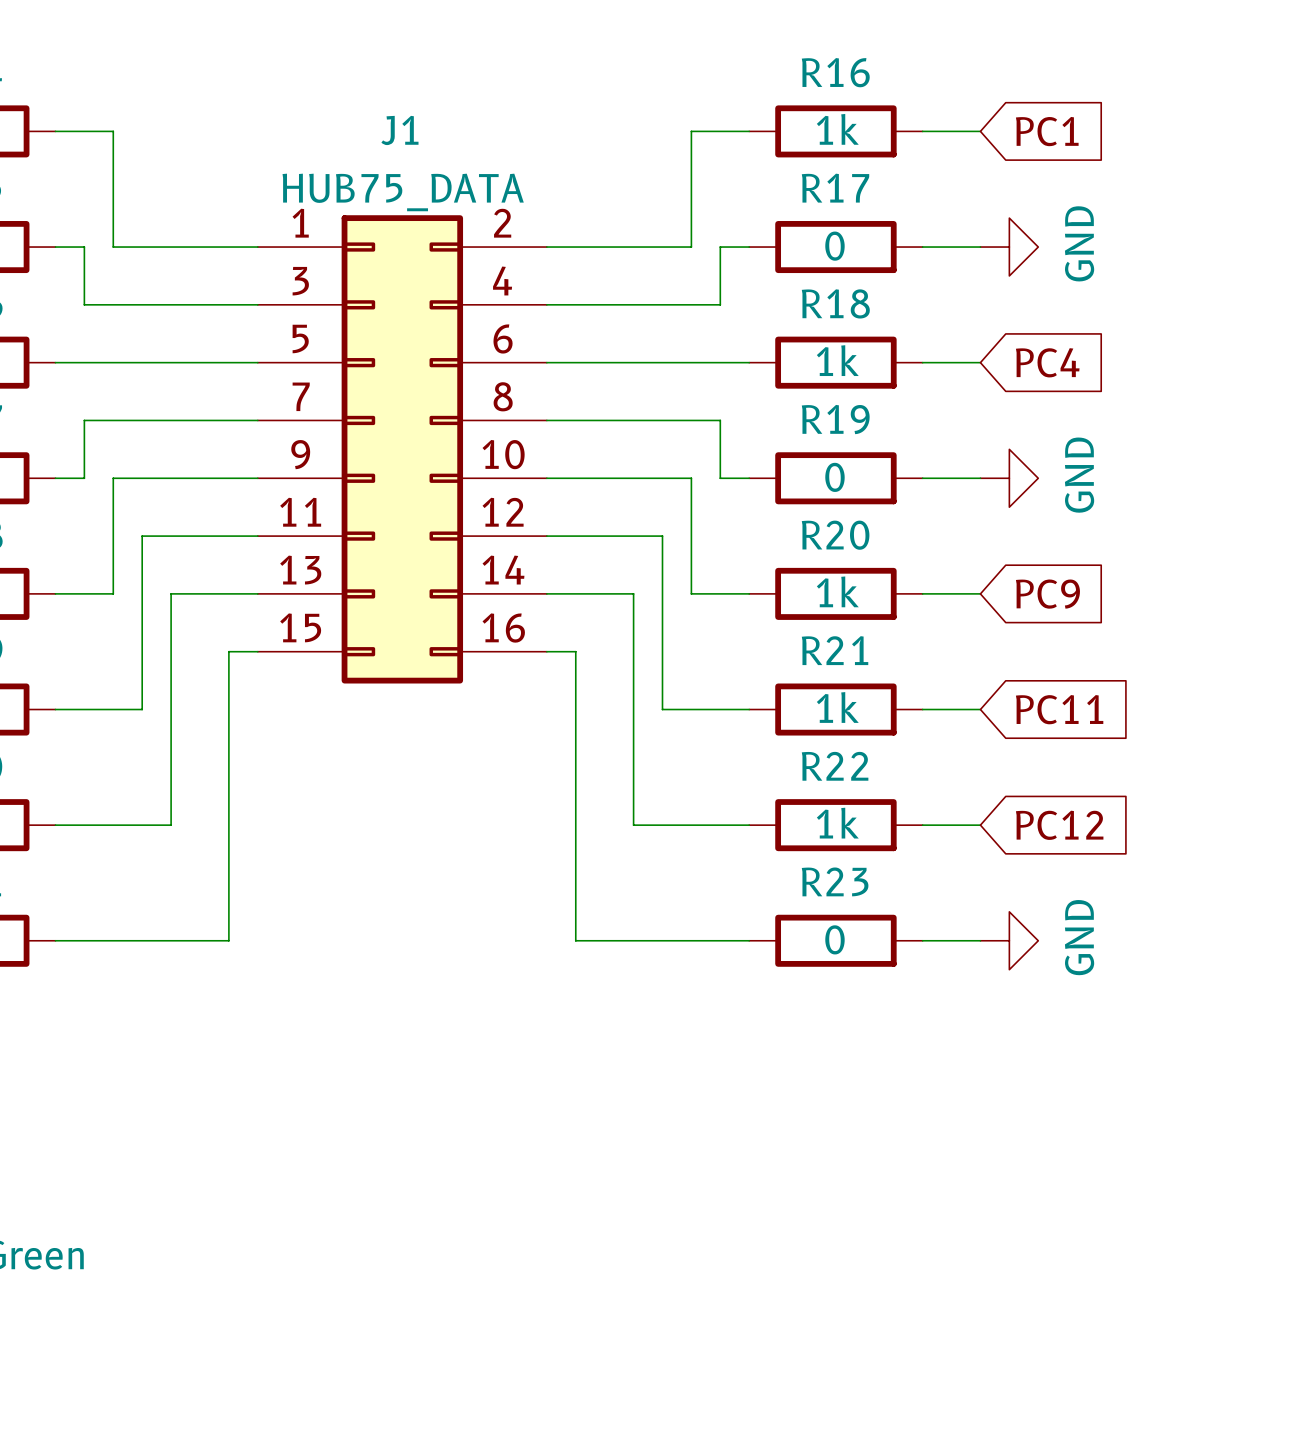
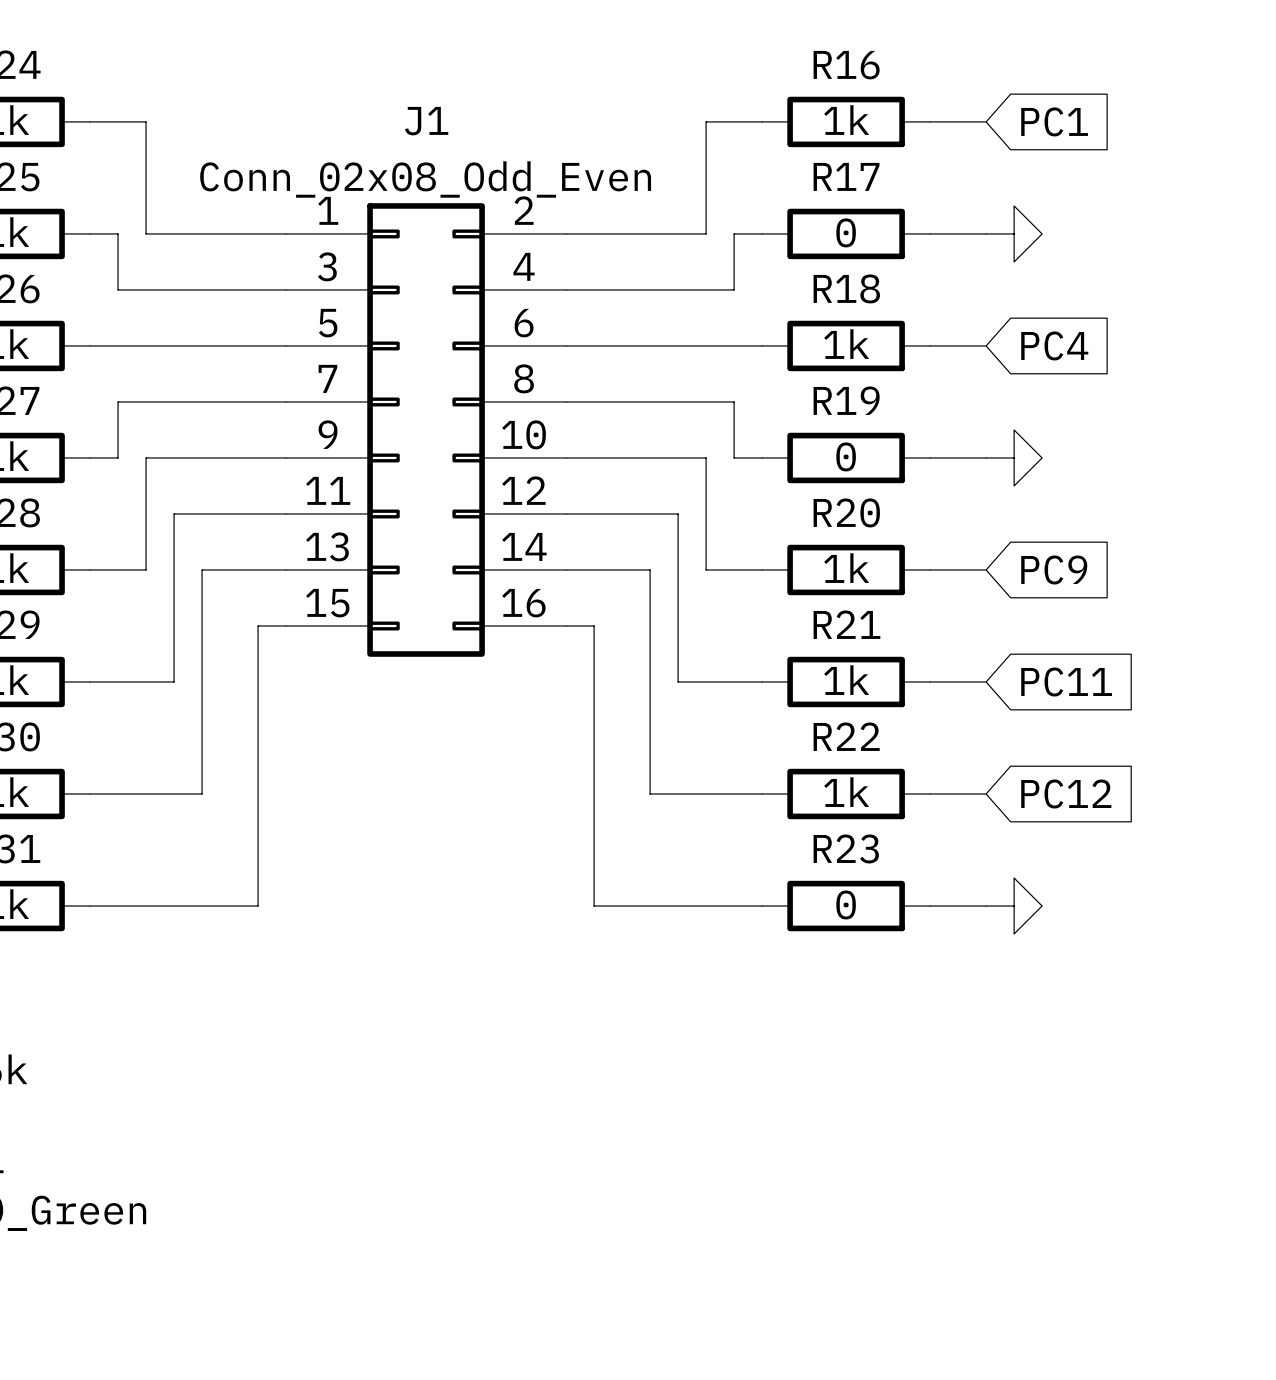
J1 value: HUB75_DATA (403, 192) -> Conn_02x08_Odd_Even (425, 179)
power symbol text: GND (1079, 243) -> none
power symbol text: GND (1079, 475) -> none
power symbol text: GND (1079, 937) -> none

